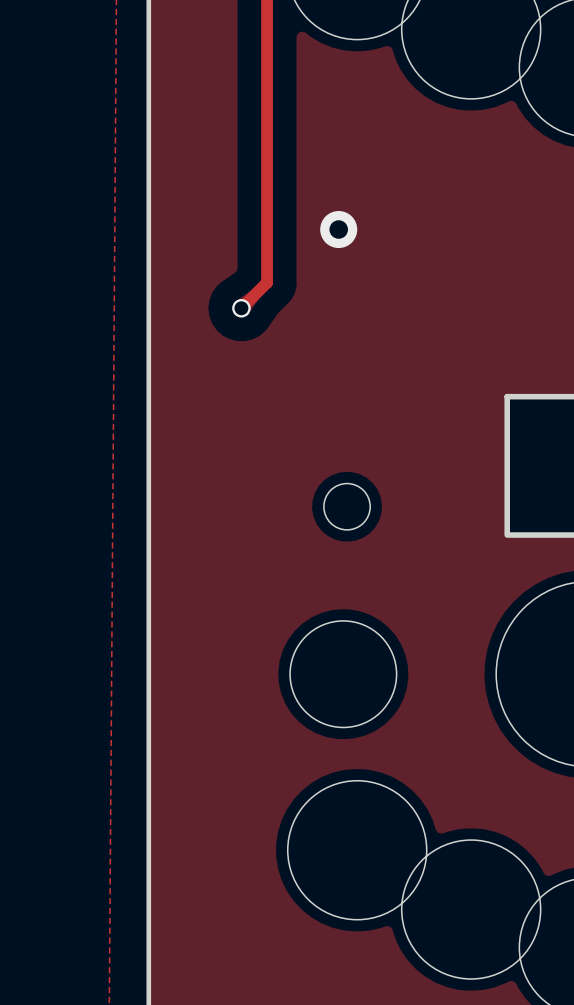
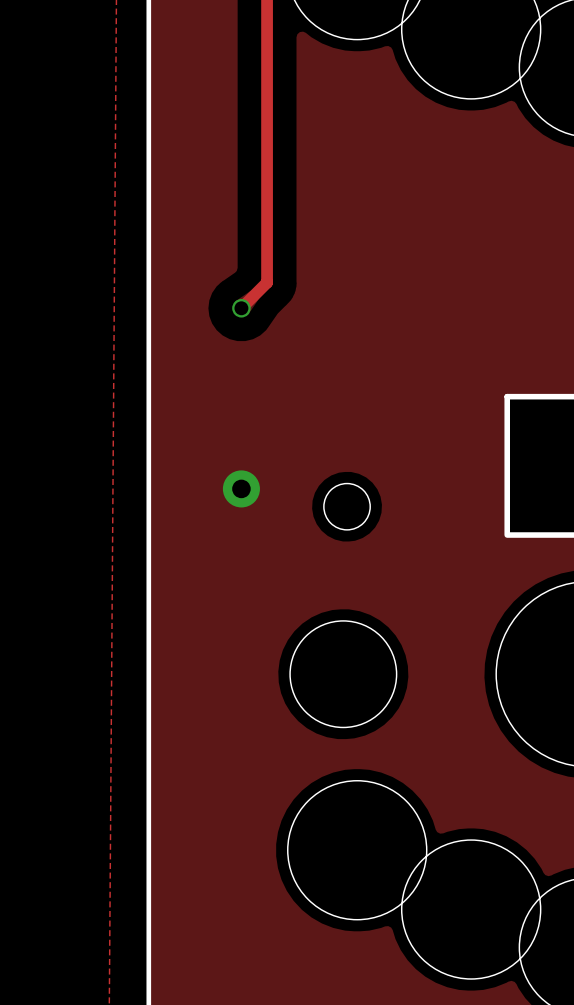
via position: (338, 229) -> (241, 488)

